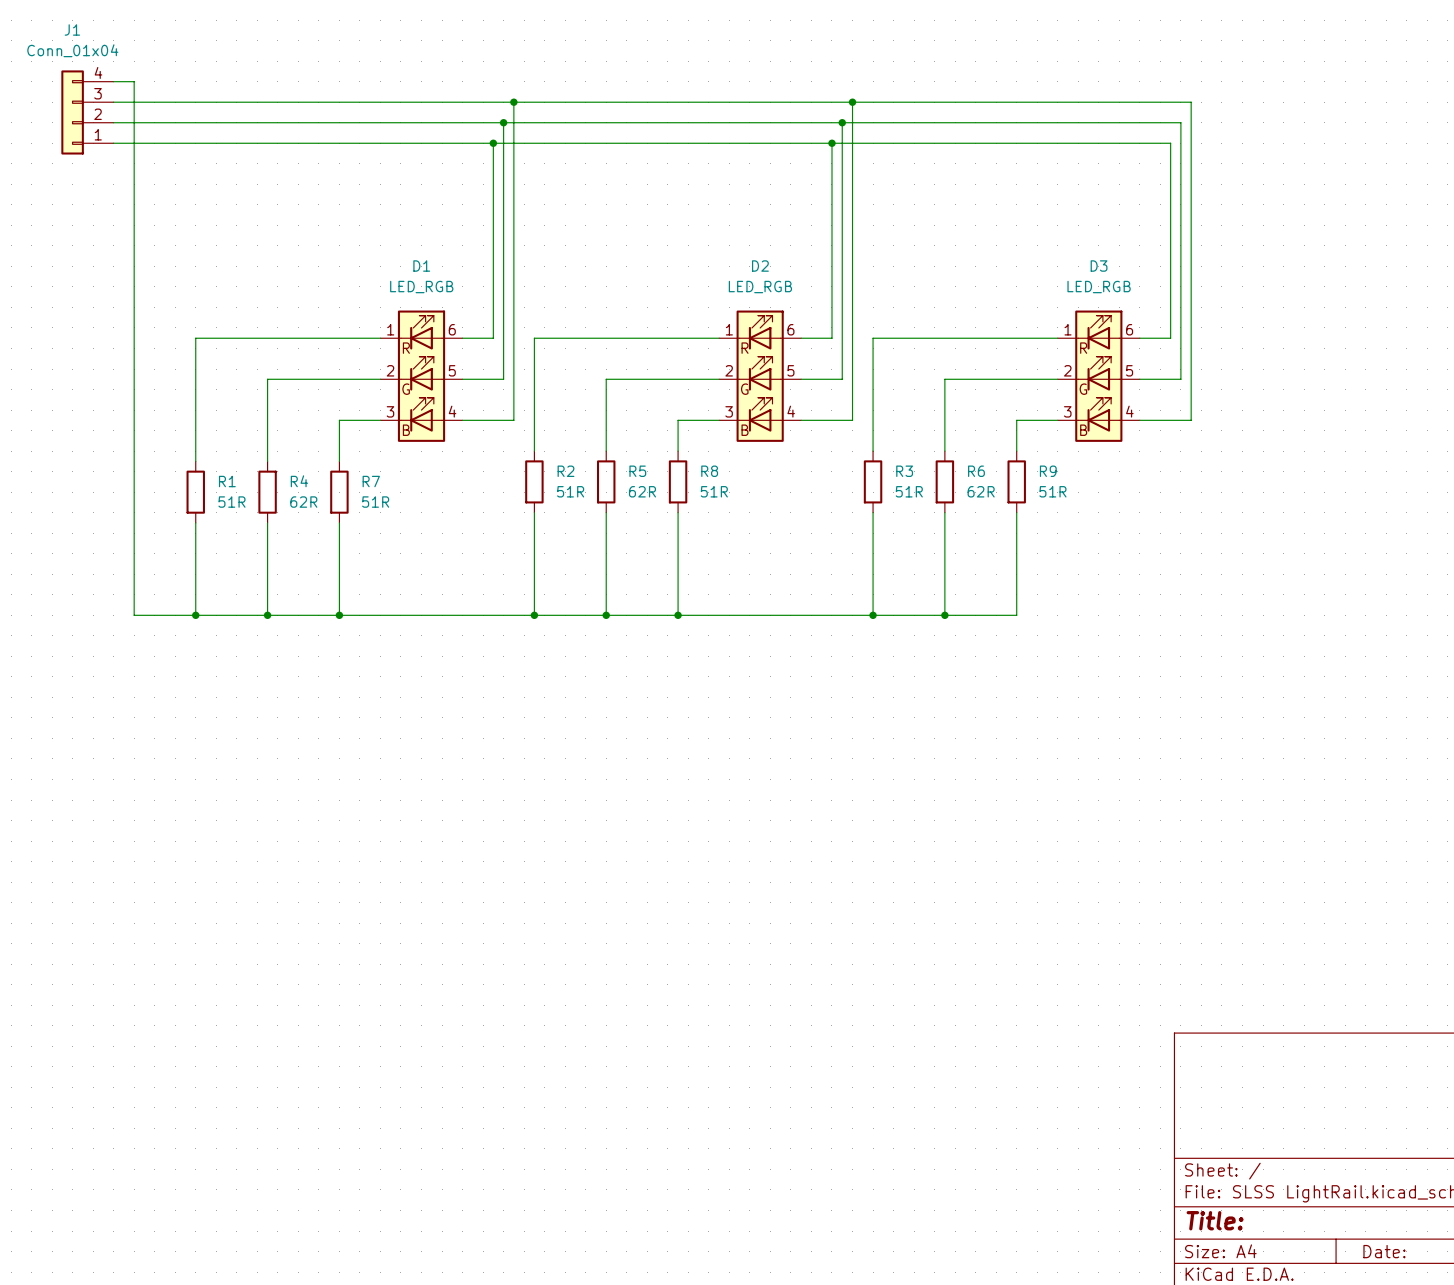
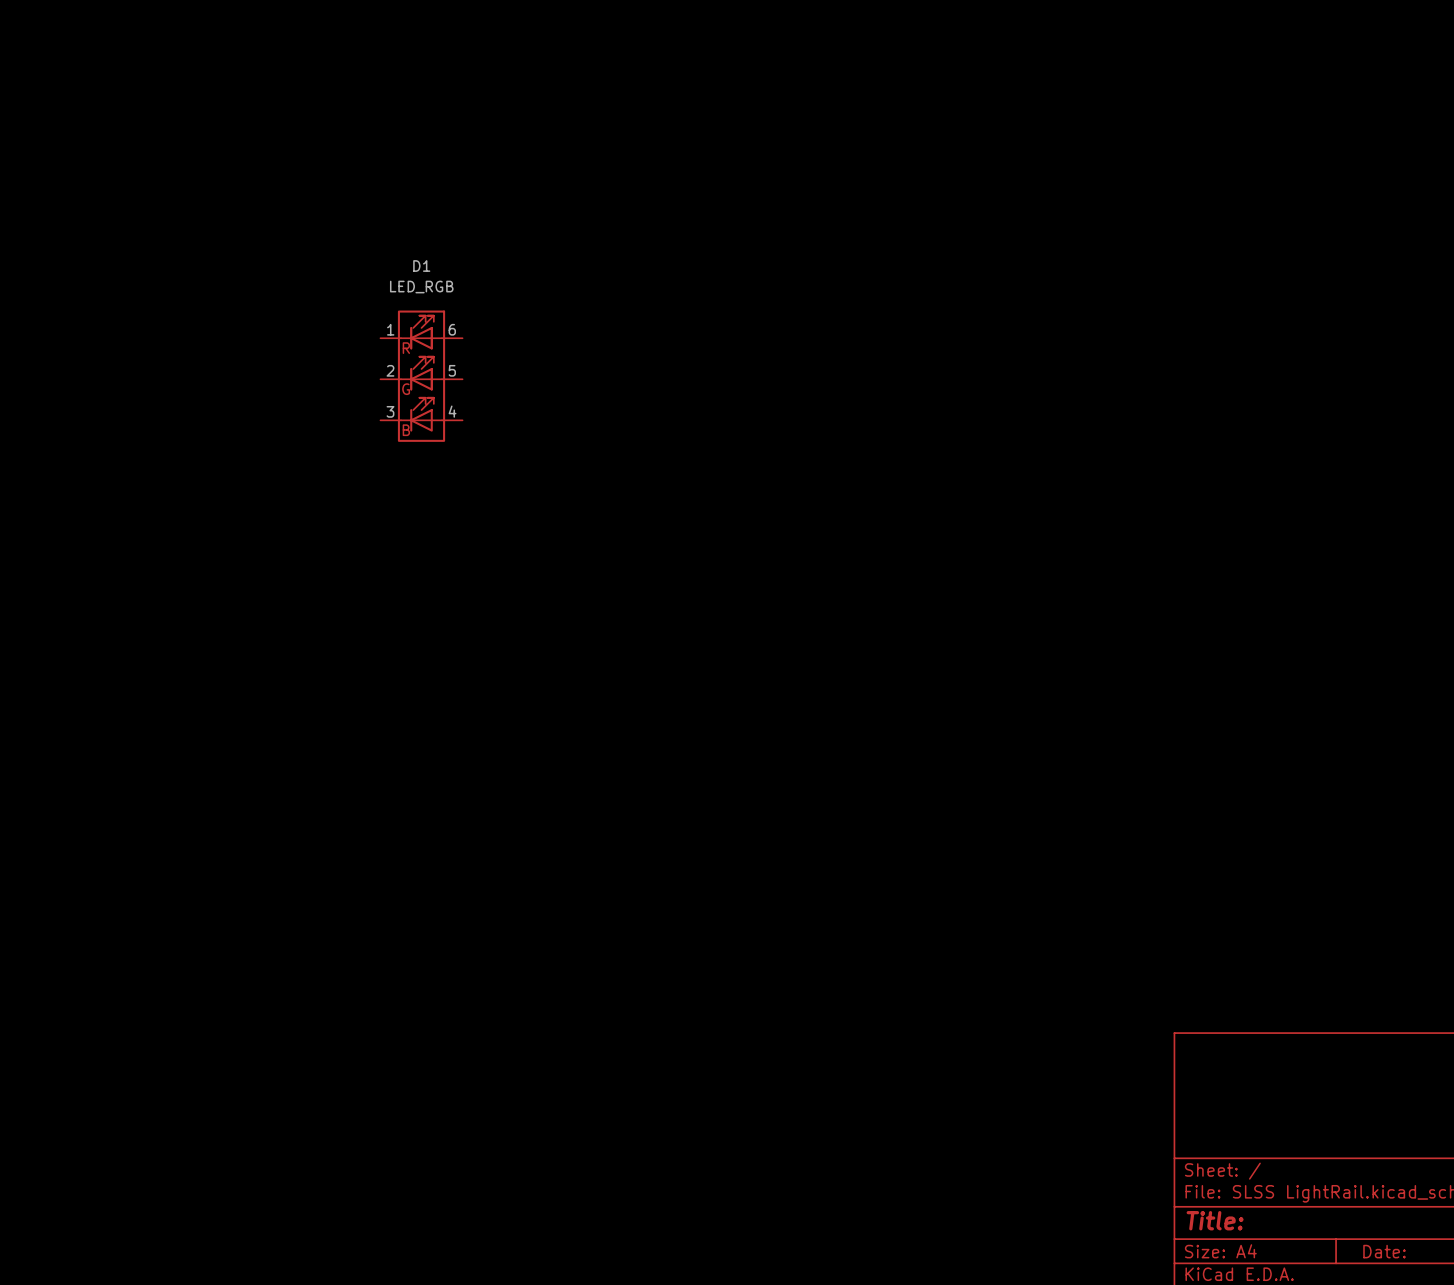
wire: (113, 81) (134, 81) (134, 615) (1016, 615) (1016, 512) -> none
wire: (113, 102) (1191, 102) (1191, 420) (1139, 420) -> none
wire: (513, 102) (513, 420) (462, 420) -> none
junction: (513, 102) -> none
wire: (852, 102) (852, 420) (801, 420) -> none
junction: (852, 102) -> none
J1: Conn_01x04 (87, 112) -> none
wire: (113, 122) (1180, 122) (1180, 379) (1139, 379) -> none
wire: (503, 122) (503, 379) (462, 379) -> none
junction: (503, 122) -> none
wire: (842, 122) (842, 379) (801, 379) -> none
junction: (842, 122) -> none
wire: (113, 143) (1170, 143) (1170, 338) (1139, 338) -> none
wire: (493, 143) (493, 338) (462, 338) -> none
junction: (493, 143) -> none
wire: (831, 143) (831, 338) (801, 338) -> none
junction: (831, 143) -> none
wire: (380, 338) (195, 338) (195, 461) -> none
wire: (719, 338) (534, 338) (534, 451) -> none
wire: (1057, 338) (873, 338) (873, 451) -> none
D2: LED_RGB (760, 376) -> none
D3: LED_RGB (1098, 376) -> none
wire: (380, 379) (267, 379) (267, 461) -> none
wire: (719, 379) (606, 379) (606, 451) -> none
wire: (1057, 379) (944, 379) (944, 451) -> none
wire: (380, 420) (339, 420) (339, 461) -> none
wire: (719, 420) (678, 420) (678, 451) -> none
wire: (1057, 420) (1016, 420) (1016, 451) -> none
R2: 51R (534, 481) -> none
R5: 62R (606, 481) -> none
R8: 51R (678, 481) -> none
R3: 51R (873, 481) -> none
R6: 62R (944, 481) -> none
R9: 51R (1016, 481) -> none
R1: 51R (195, 492) -> none
R4: 62R (267, 492) -> none
R7: 51R (339, 492) -> none
wire: (534, 512) (534, 615) -> none
wire: (606, 512) (606, 615) -> none
wire: (678, 512) (678, 615) -> none
wire: (873, 512) (873, 615) -> none
wire: (944, 512) (944, 615) -> none
wire: (195, 522) (195, 615) -> none
wire: (267, 522) (267, 615) -> none
wire: (339, 522) (339, 615) -> none
junction: (195, 615) -> none
junction: (267, 615) -> none
junction: (339, 615) -> none
junction: (534, 615) -> none
junction: (606, 615) -> none
junction: (678, 615) -> none
junction: (873, 615) -> none
junction: (944, 615) -> none

